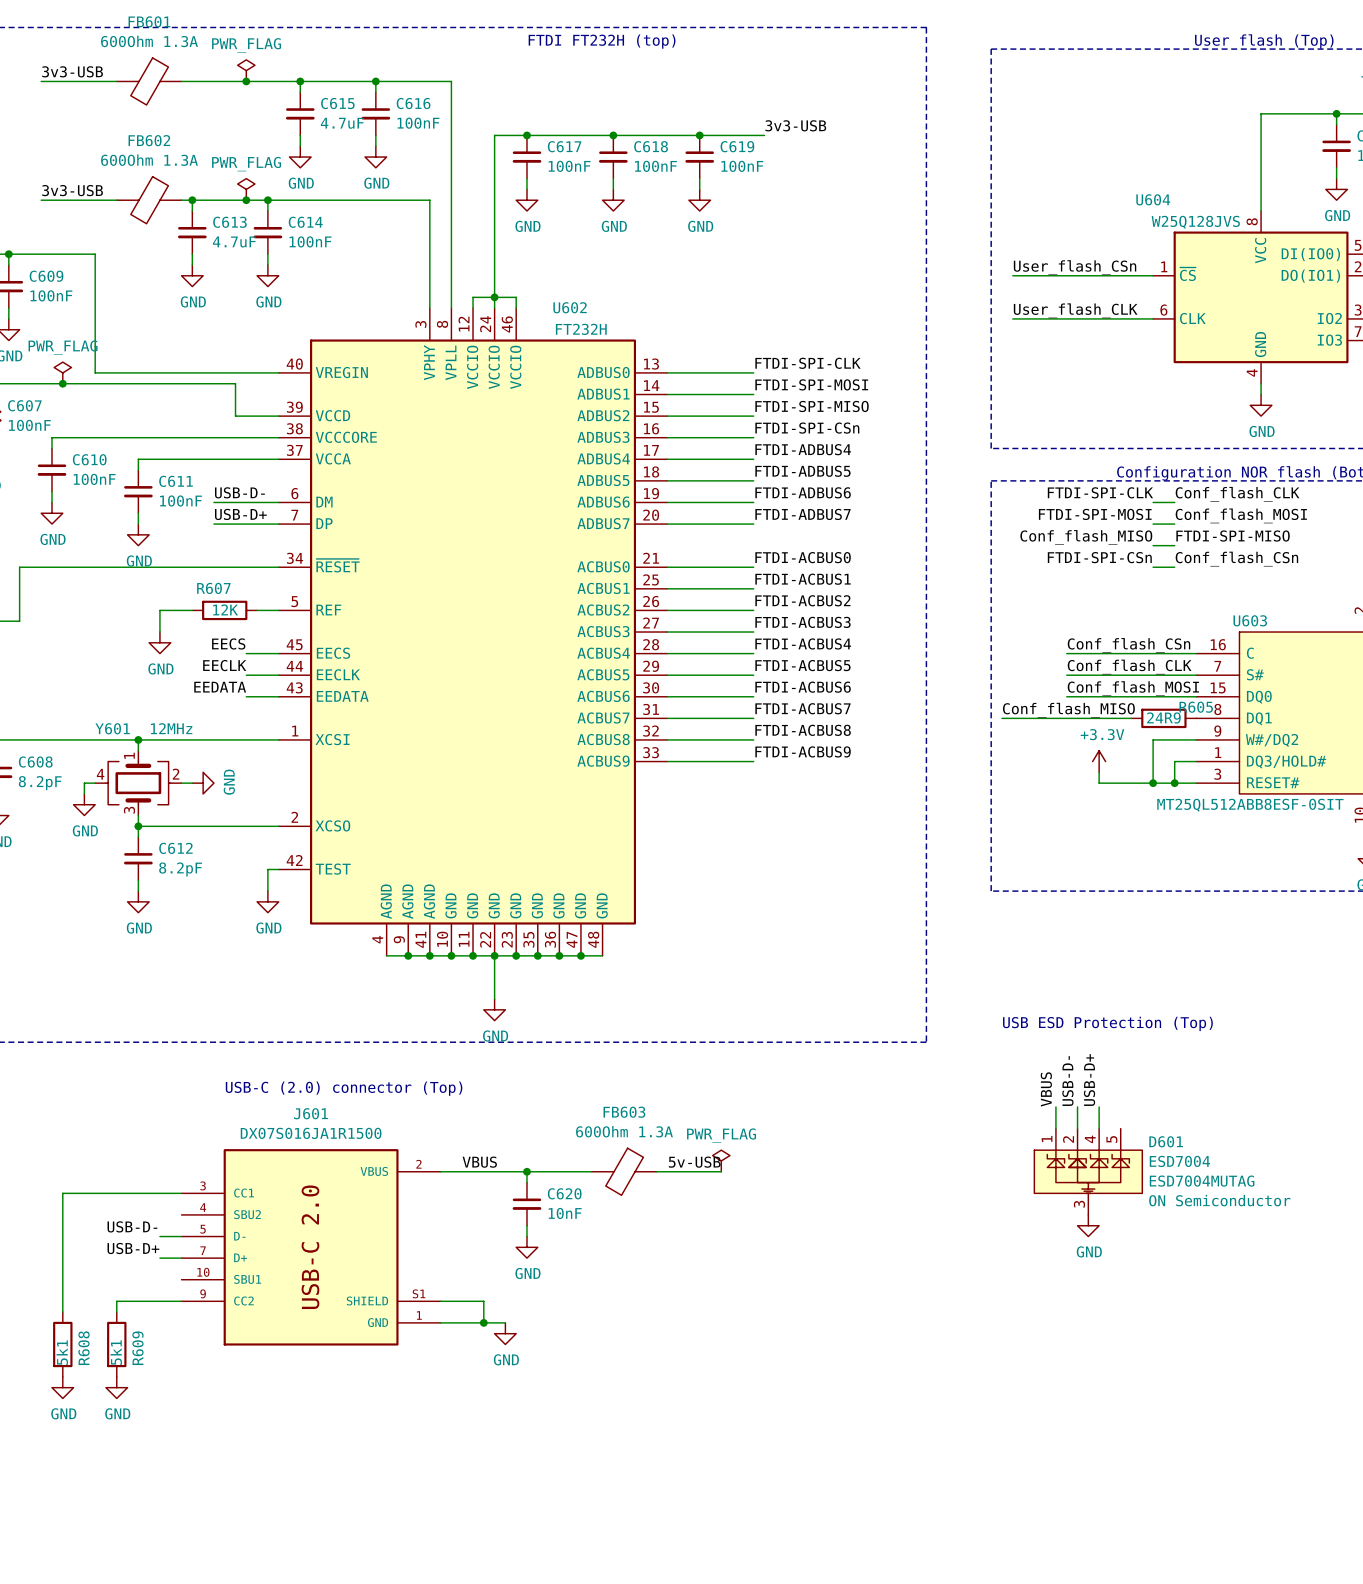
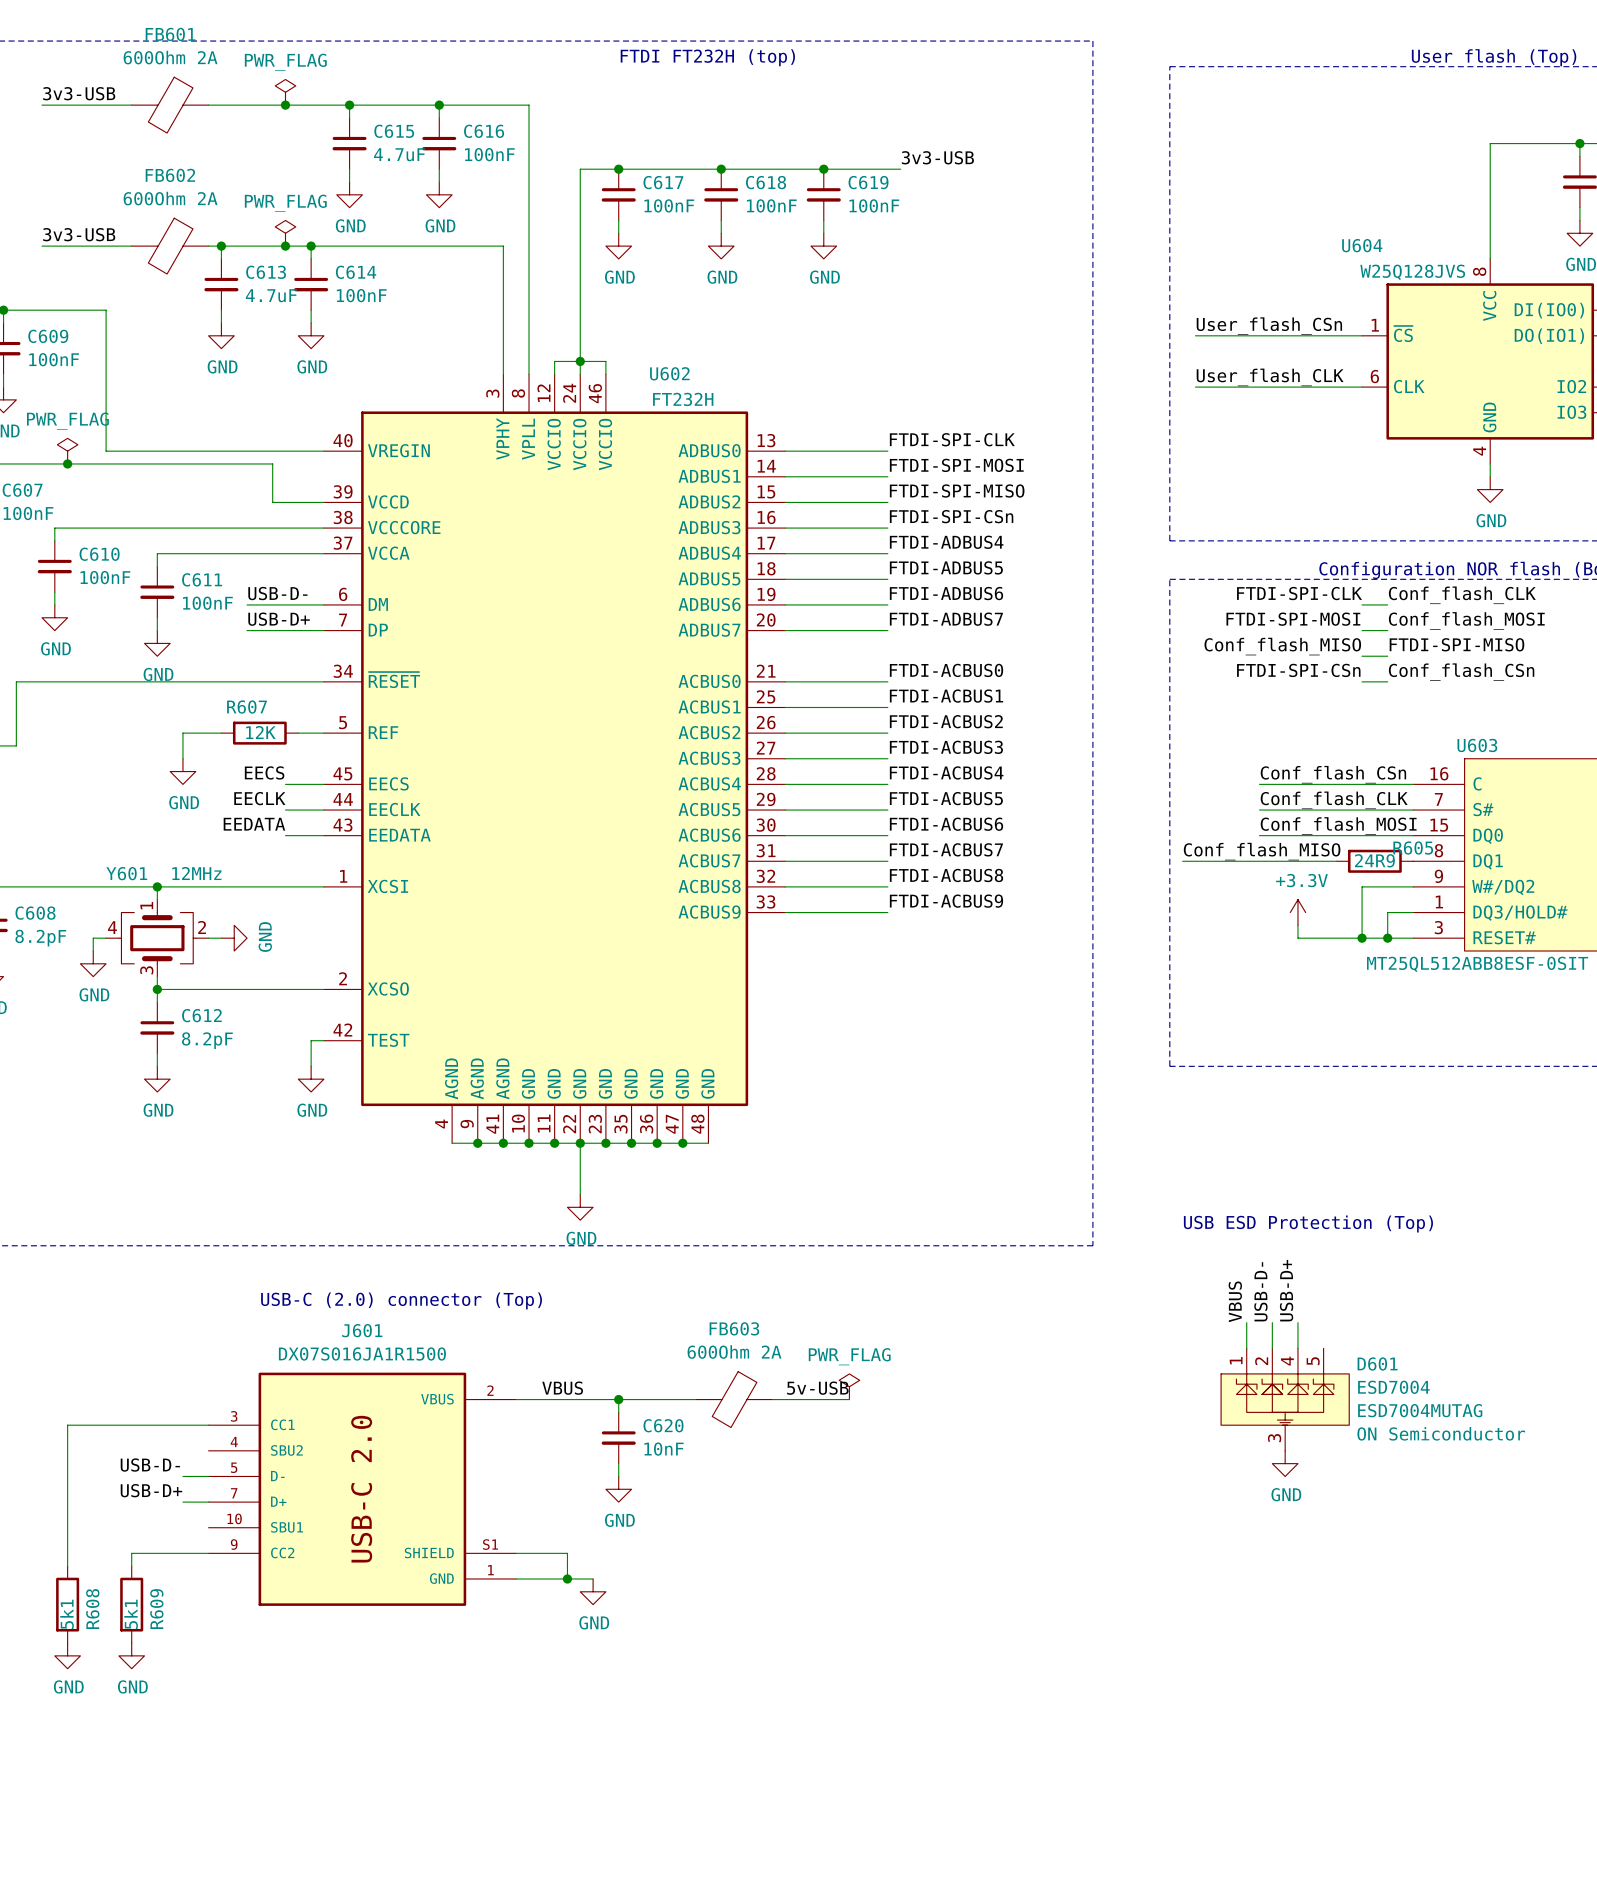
FB601 value: 600Ohm 1.3A (149, 41) -> 600Ohm 2A (170, 57)
FB602 value: 600Ohm 1.3A (149, 160) -> 600Ohm 2A (170, 198)
FB603 value: 600Ohm 1.3A (624, 1131) -> 600Ohm 2A (734, 1352)

